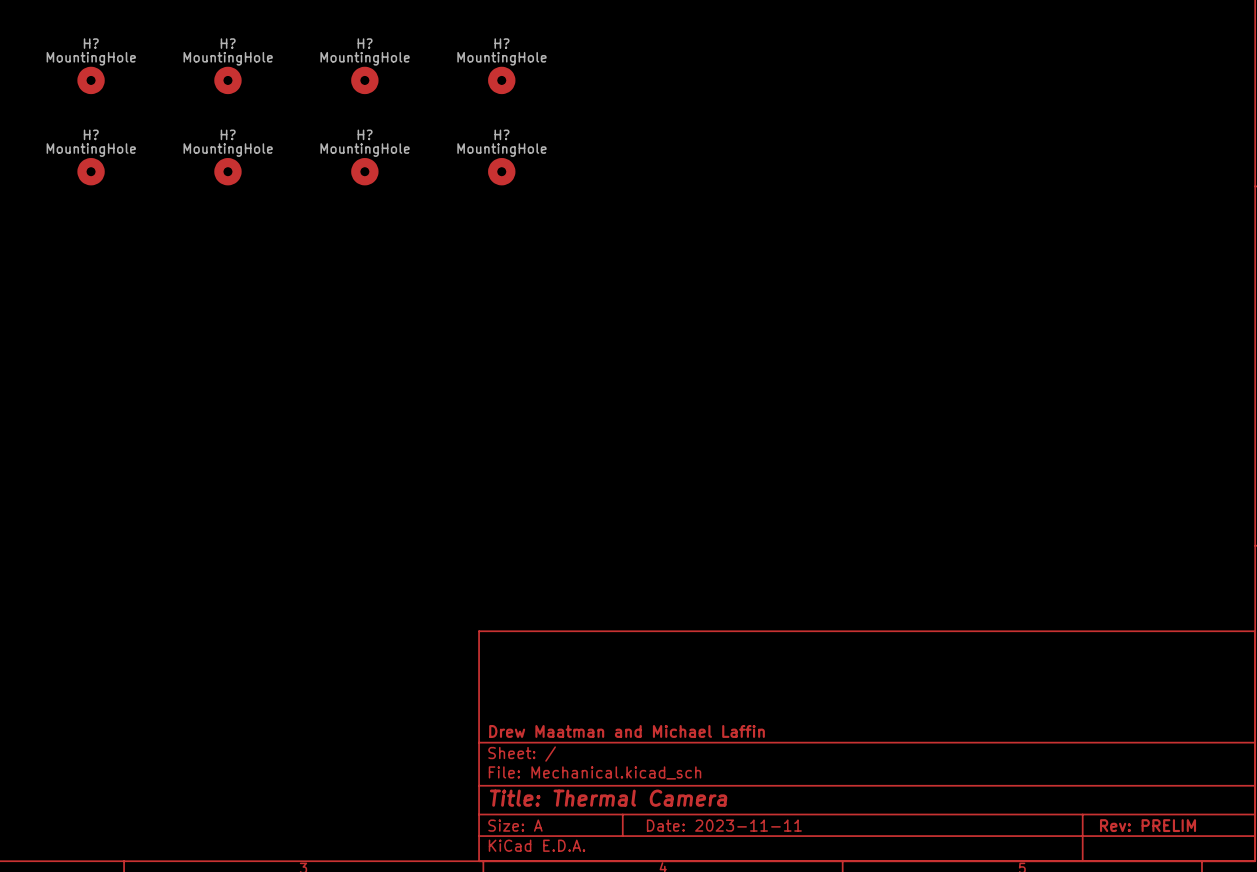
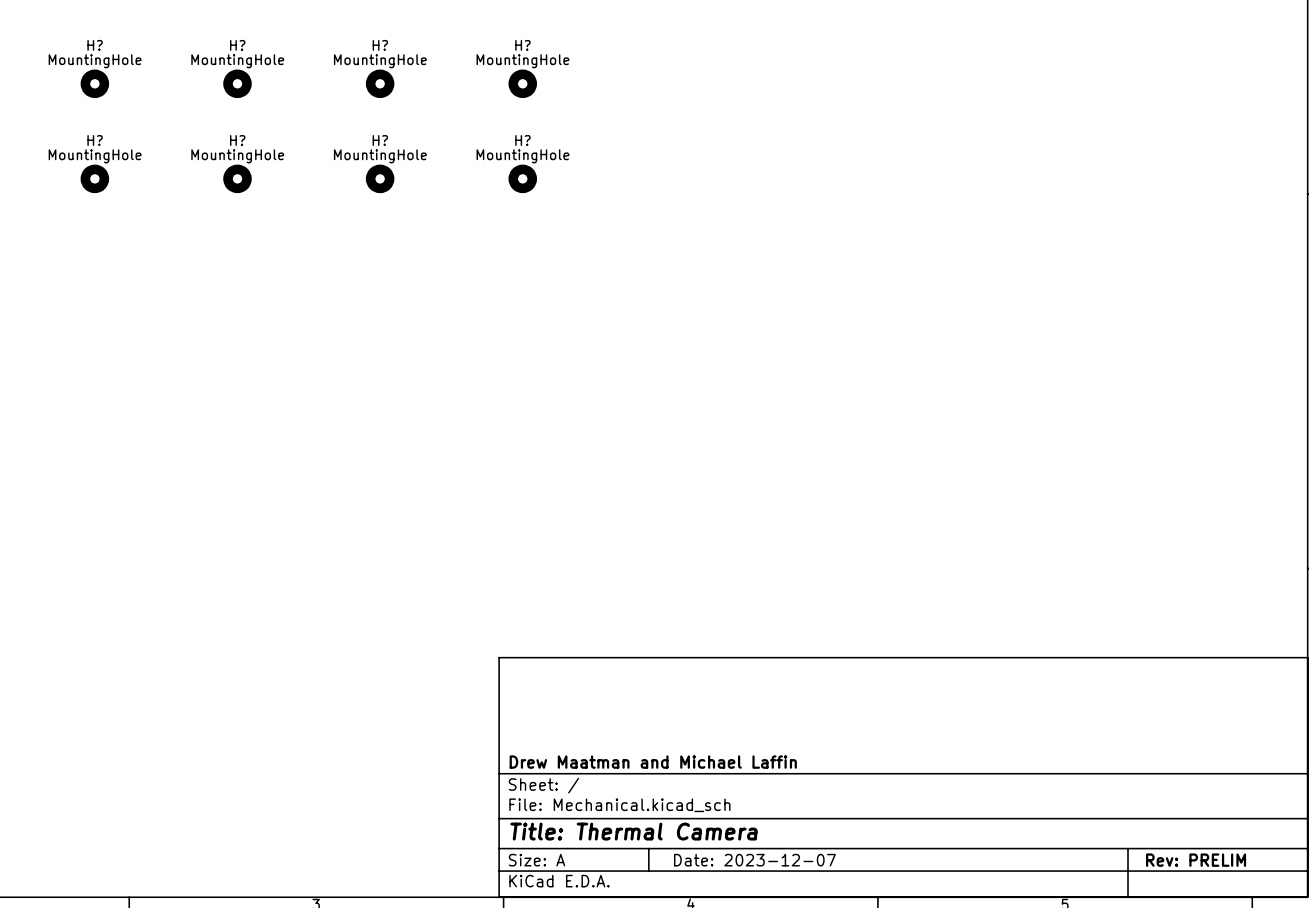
title block: Date: 2023-11-11 (724, 825) -> Date: 2023-12-07 (754, 860)

